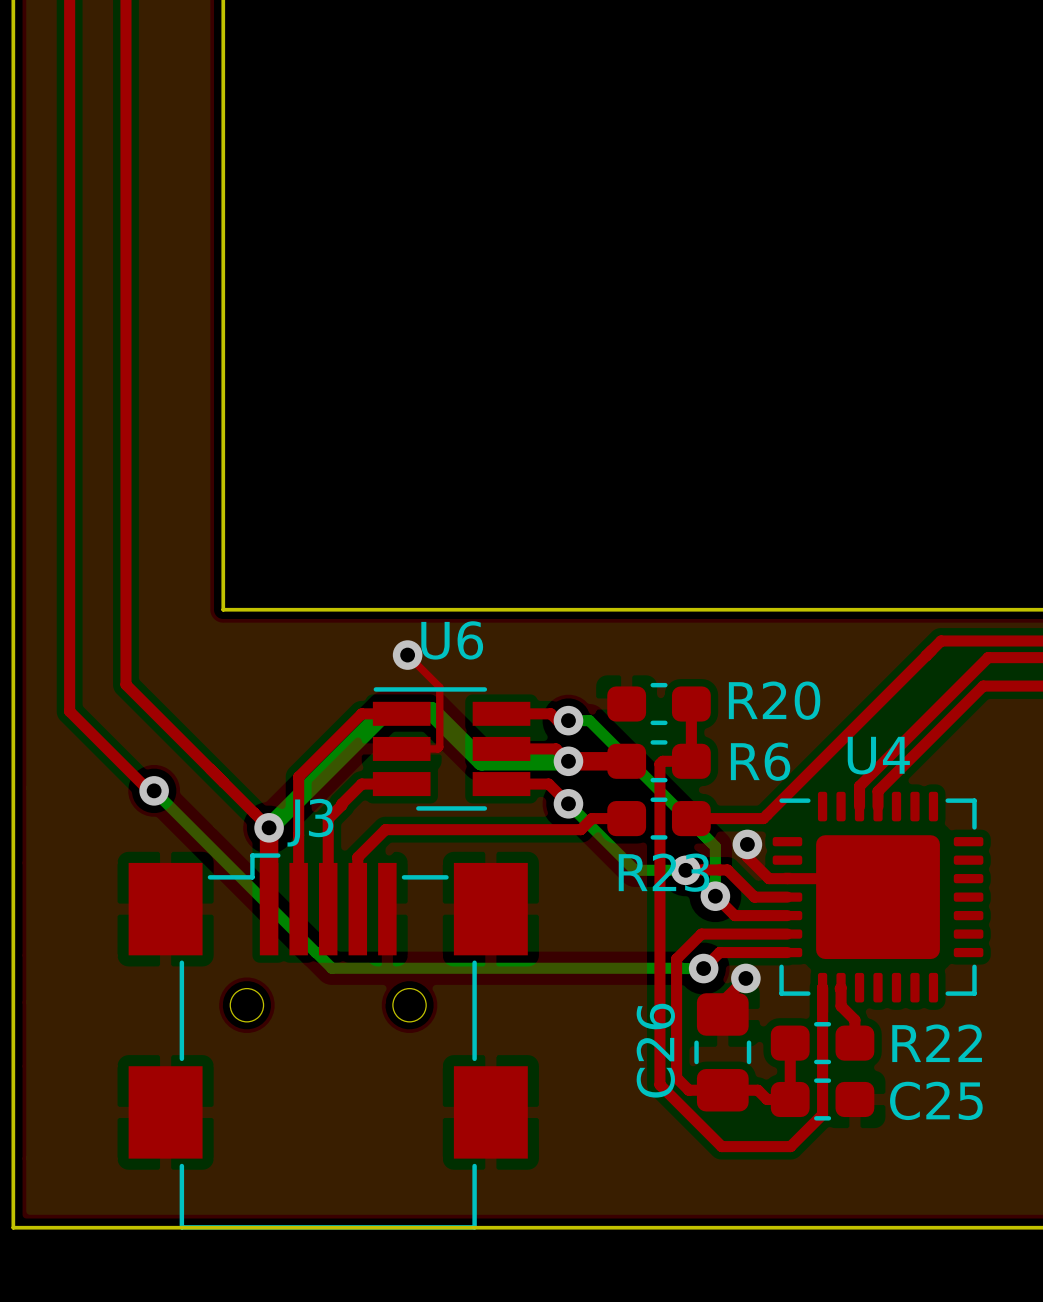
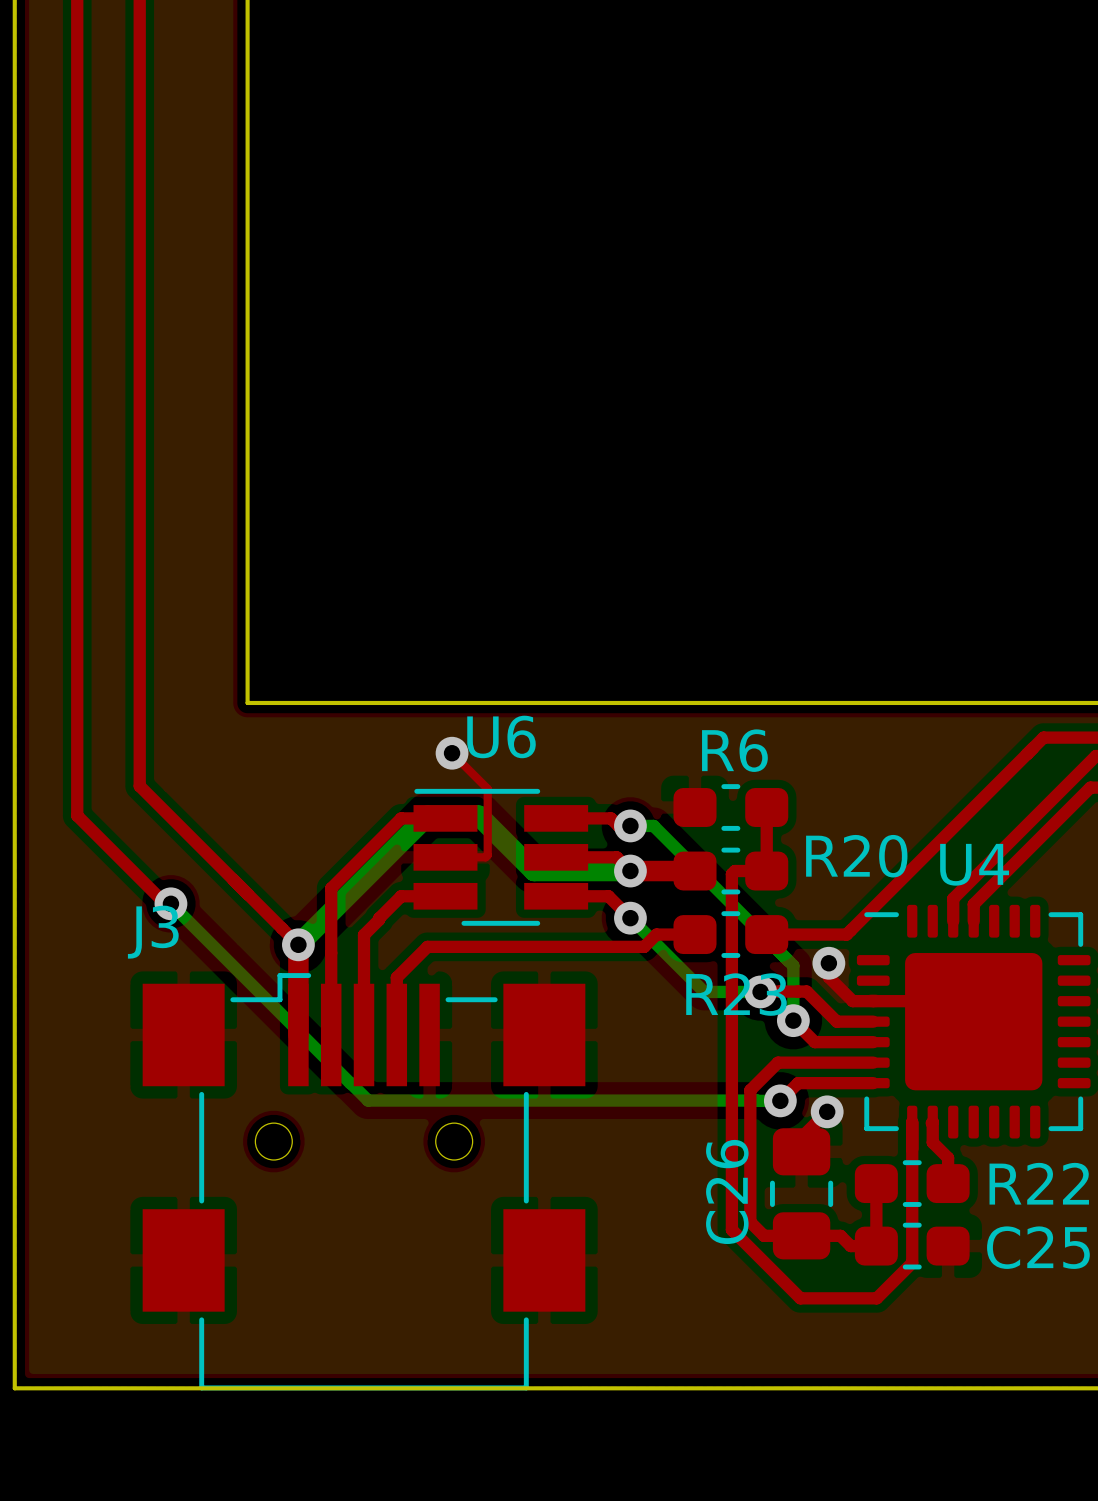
R20 name position: R20 (774, 700) -> R20 (856, 856)
R6 name position: R6 (760, 761) -> R6 (734, 750)
J3 name position: J3 (310, 822) -> J3 (153, 932)

